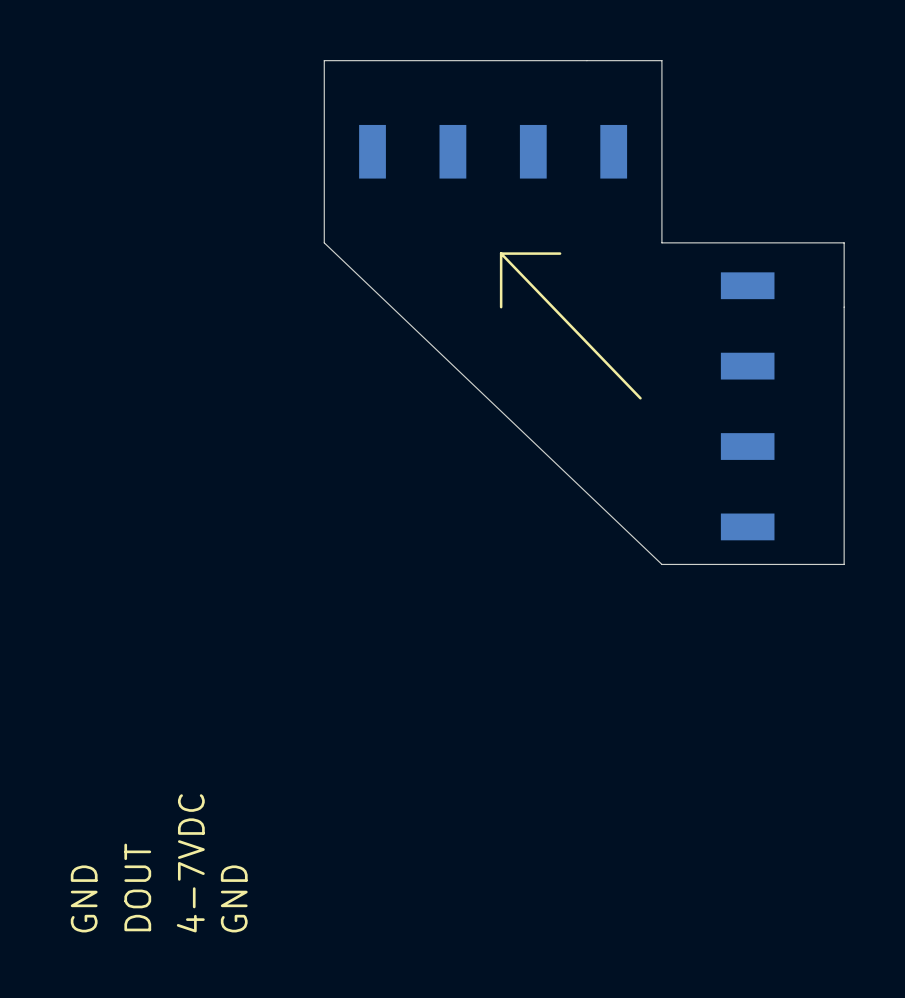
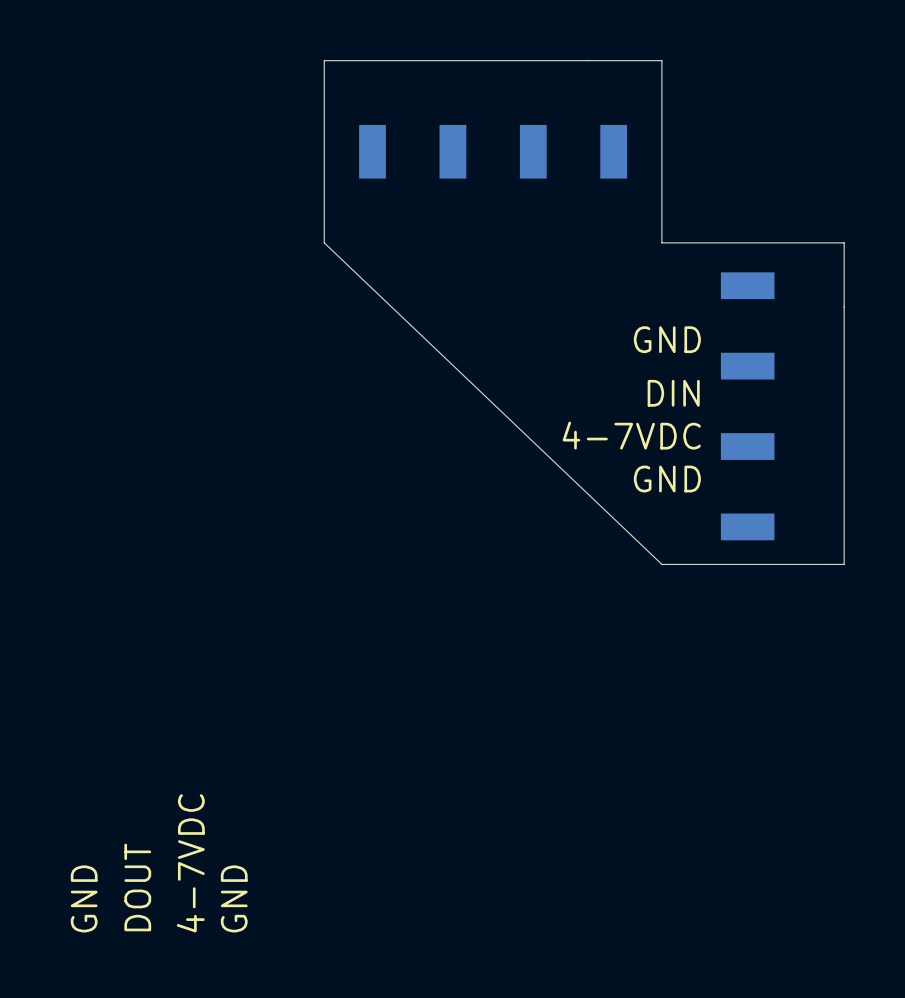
line: (501, 253) (640, 398) -> none
line: (501, 253) (501, 307) -> none
line: (560, 253) (501, 253) -> none
text: none -> GND (667, 339)
text: none -> DIN (673, 393)
text: none -> 4-7VDC (631, 435)
text: none -> GND (667, 479)

